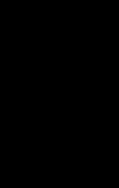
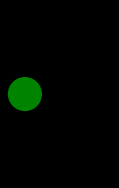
part: none -> (24, 94)

